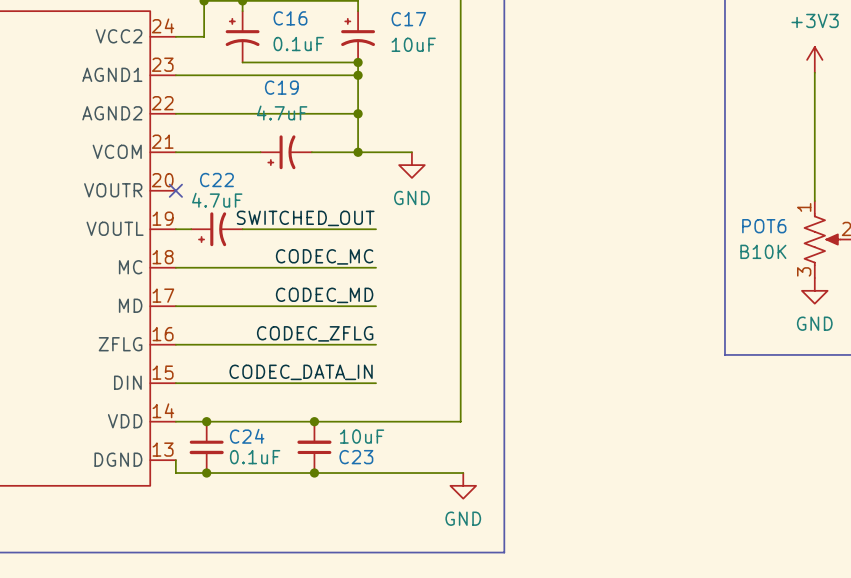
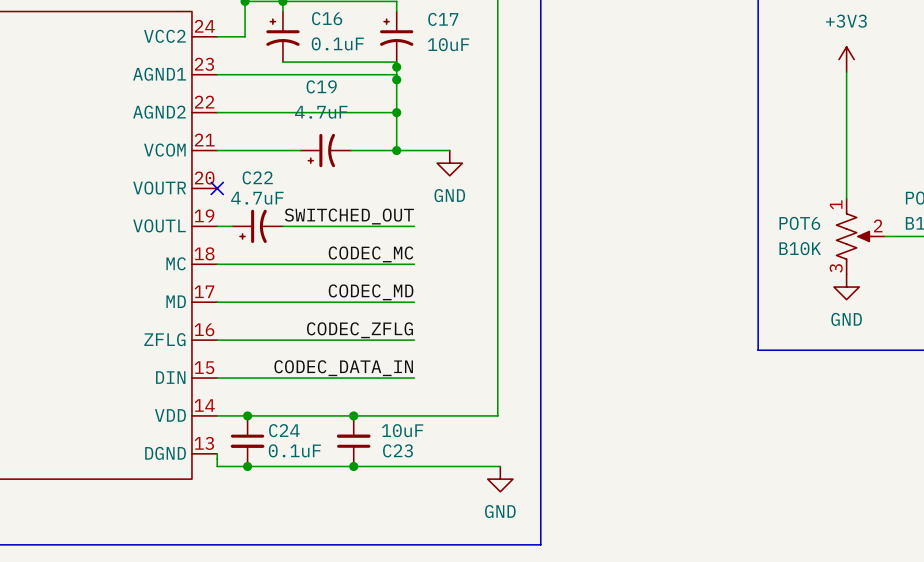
junction: (358, 62) -> none
junction: none -> (396, 67)
junction: (358, 75) -> none
junction: none -> (396, 79)

